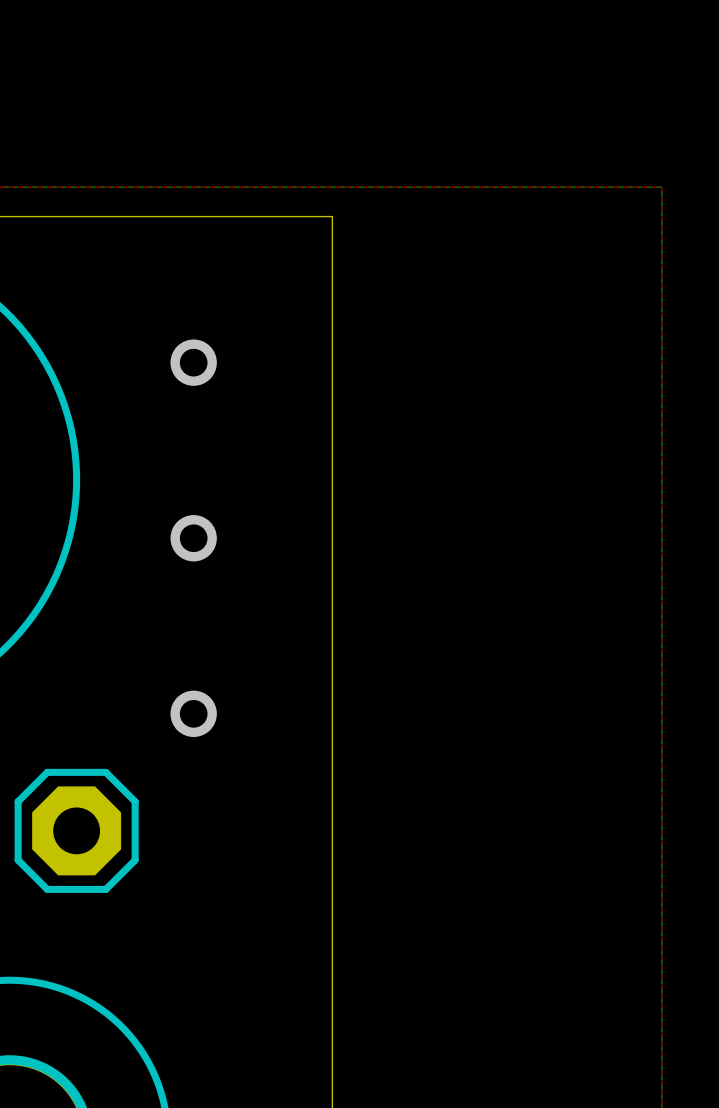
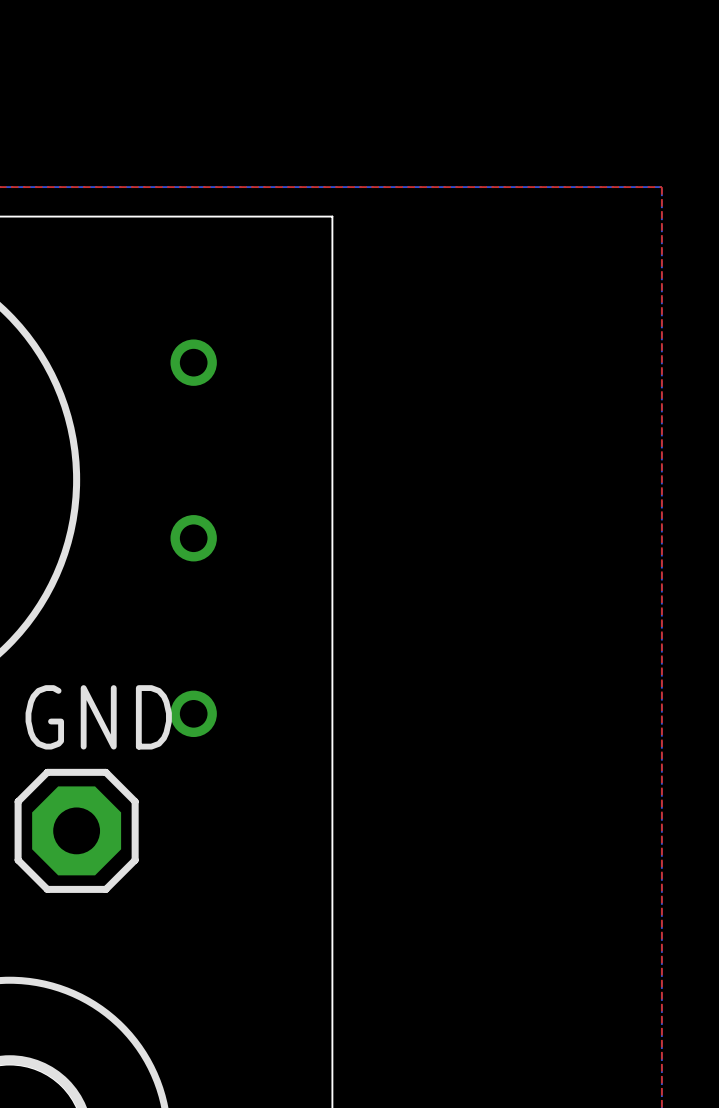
GND name: none -> GND (98, 717)

